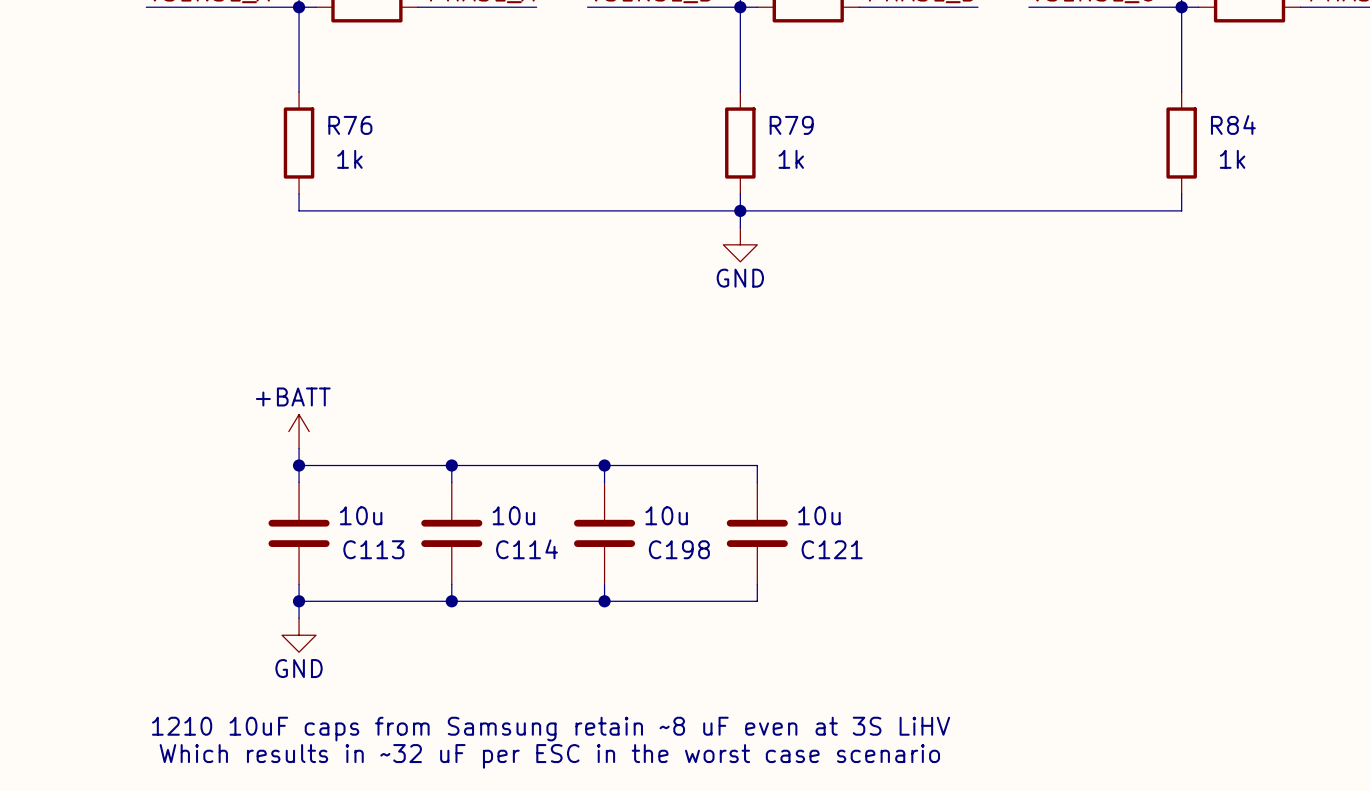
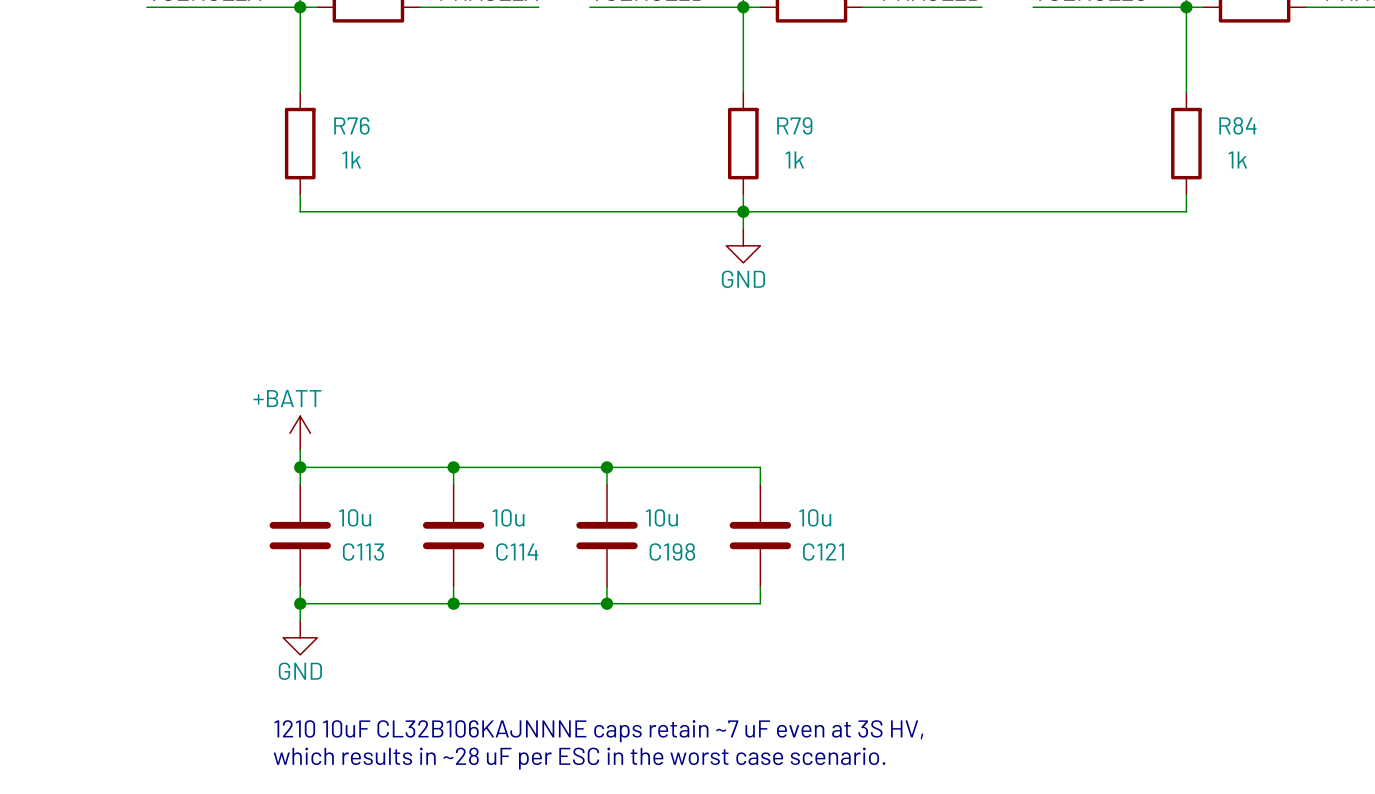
text: 1210 10uF caps from Samsung retain ~8 uF even at 3S LiHV (551, 729) -> 1210 10uF CL32B106KAJNNNE caps retain ~7 uF even at 3S HV, (598, 731)
text: Which results in ~32 uF per ESC in the worst case scenario (549, 756) -> which results in ~28 uF per ESC in the worst case scenario. (579, 758)

